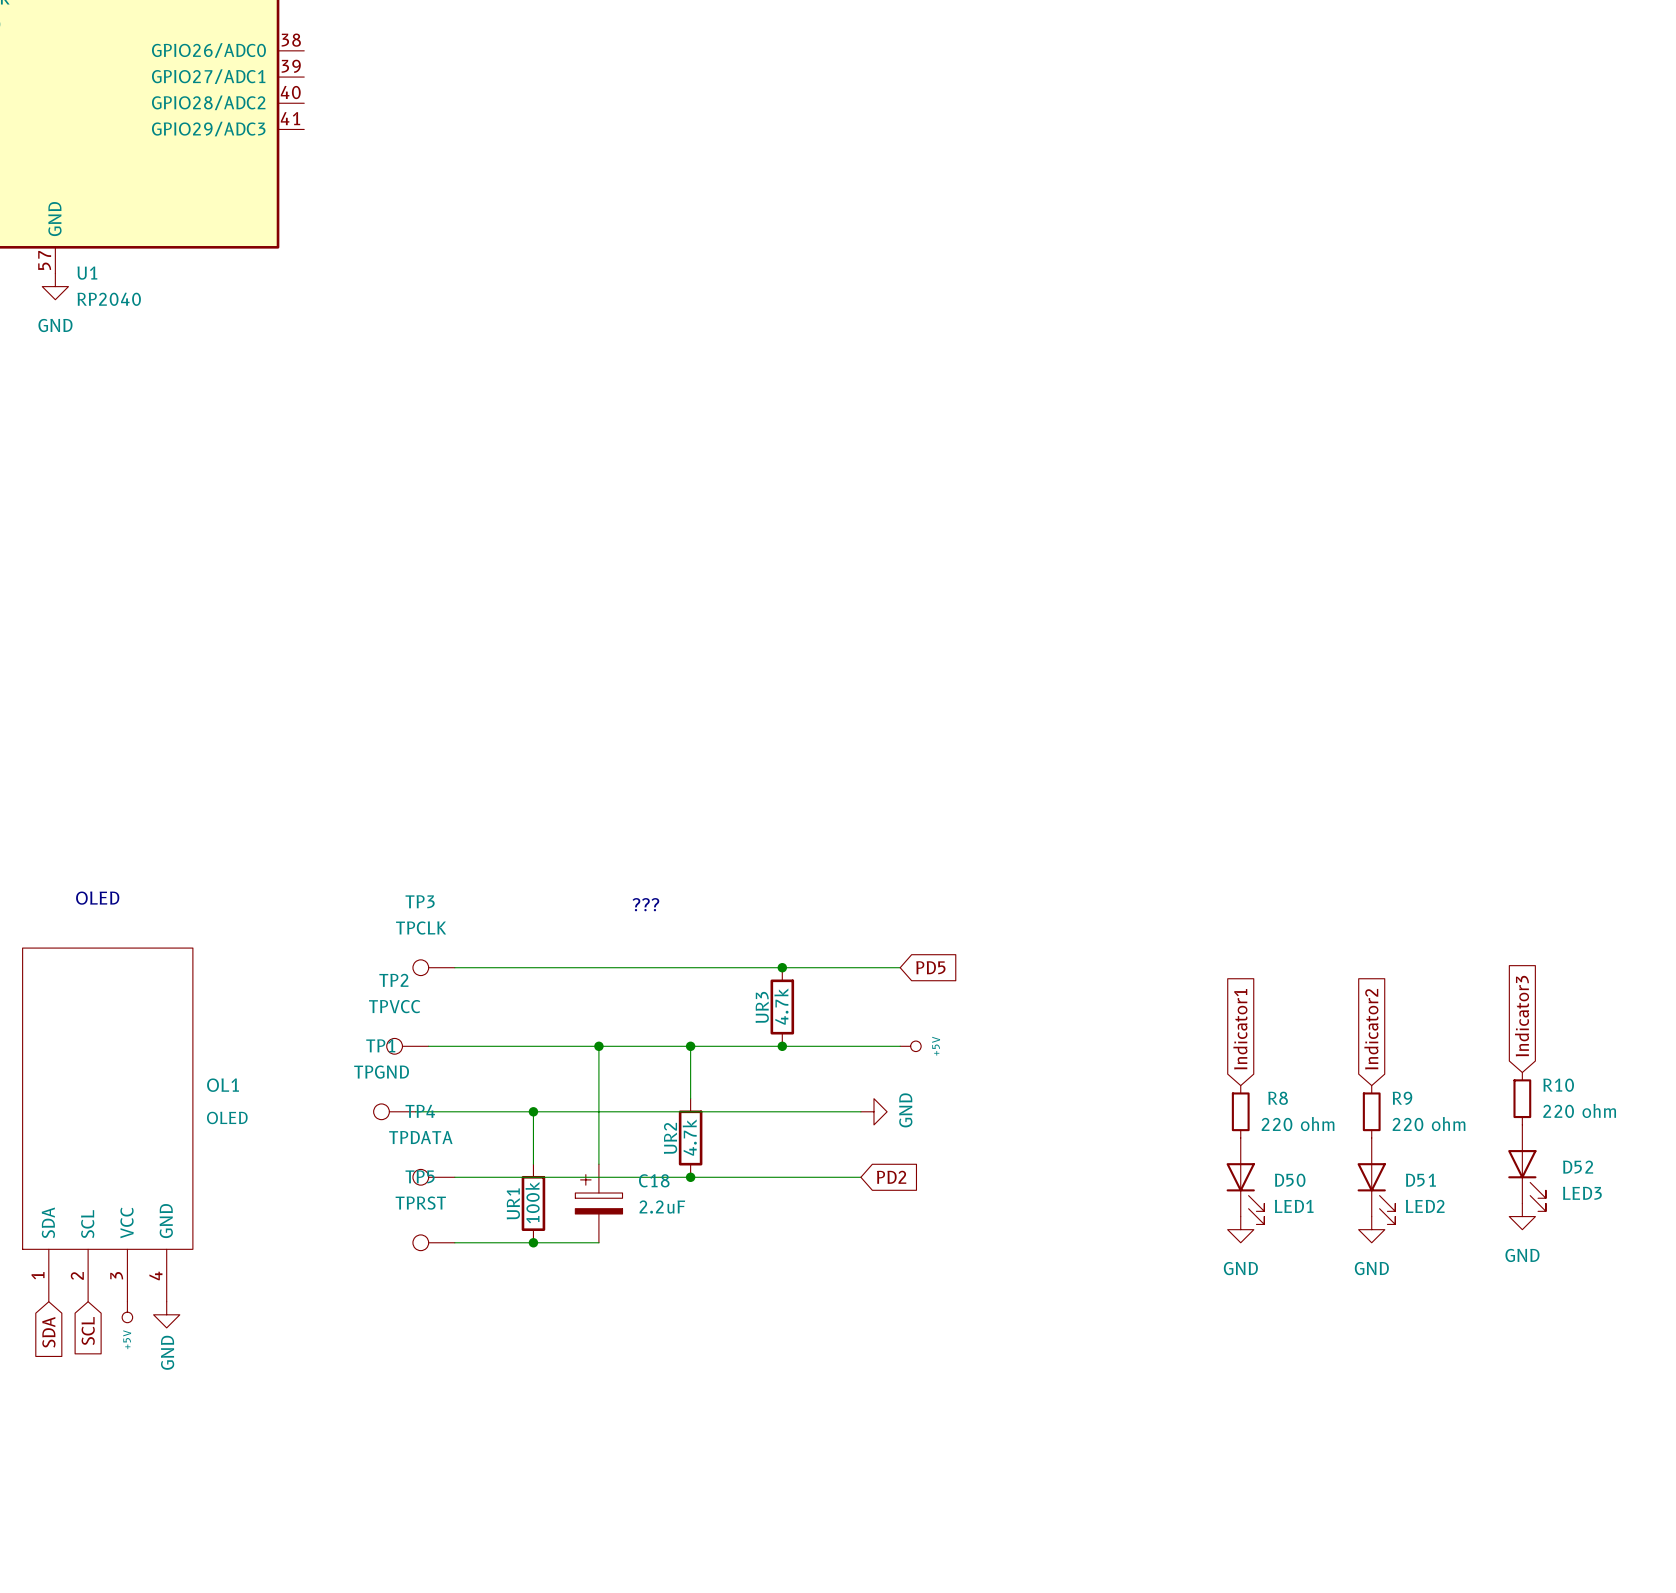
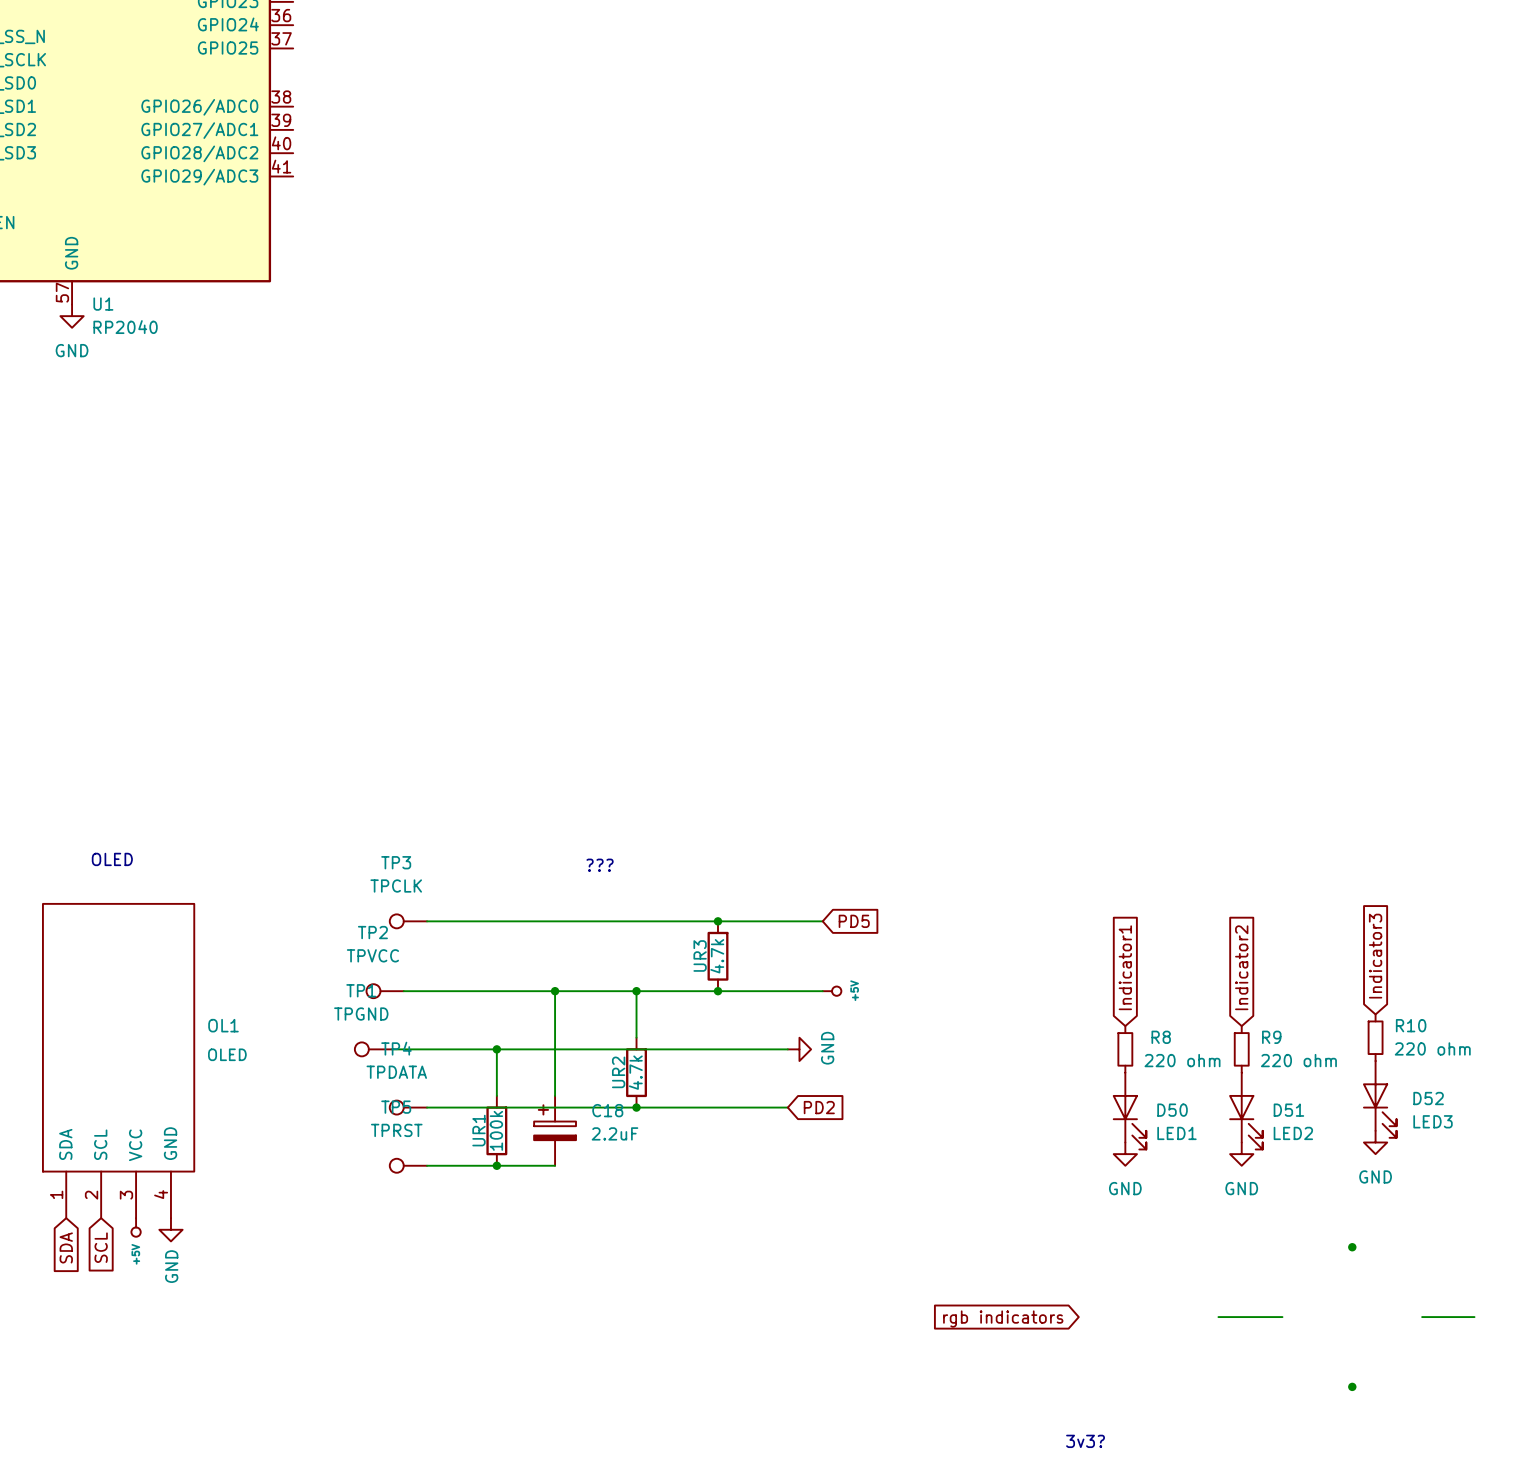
junction: none -> (1352, 1247)
wire: none -> (1218, 1317) (1282, 1317)
wire: none -> (1422, 1317) (1474, 1317)
global label: none -> rgb indicators (1003, 1319)
junction: none -> (1352, 1386)
text: none -> 3v3? (1085, 1441)

